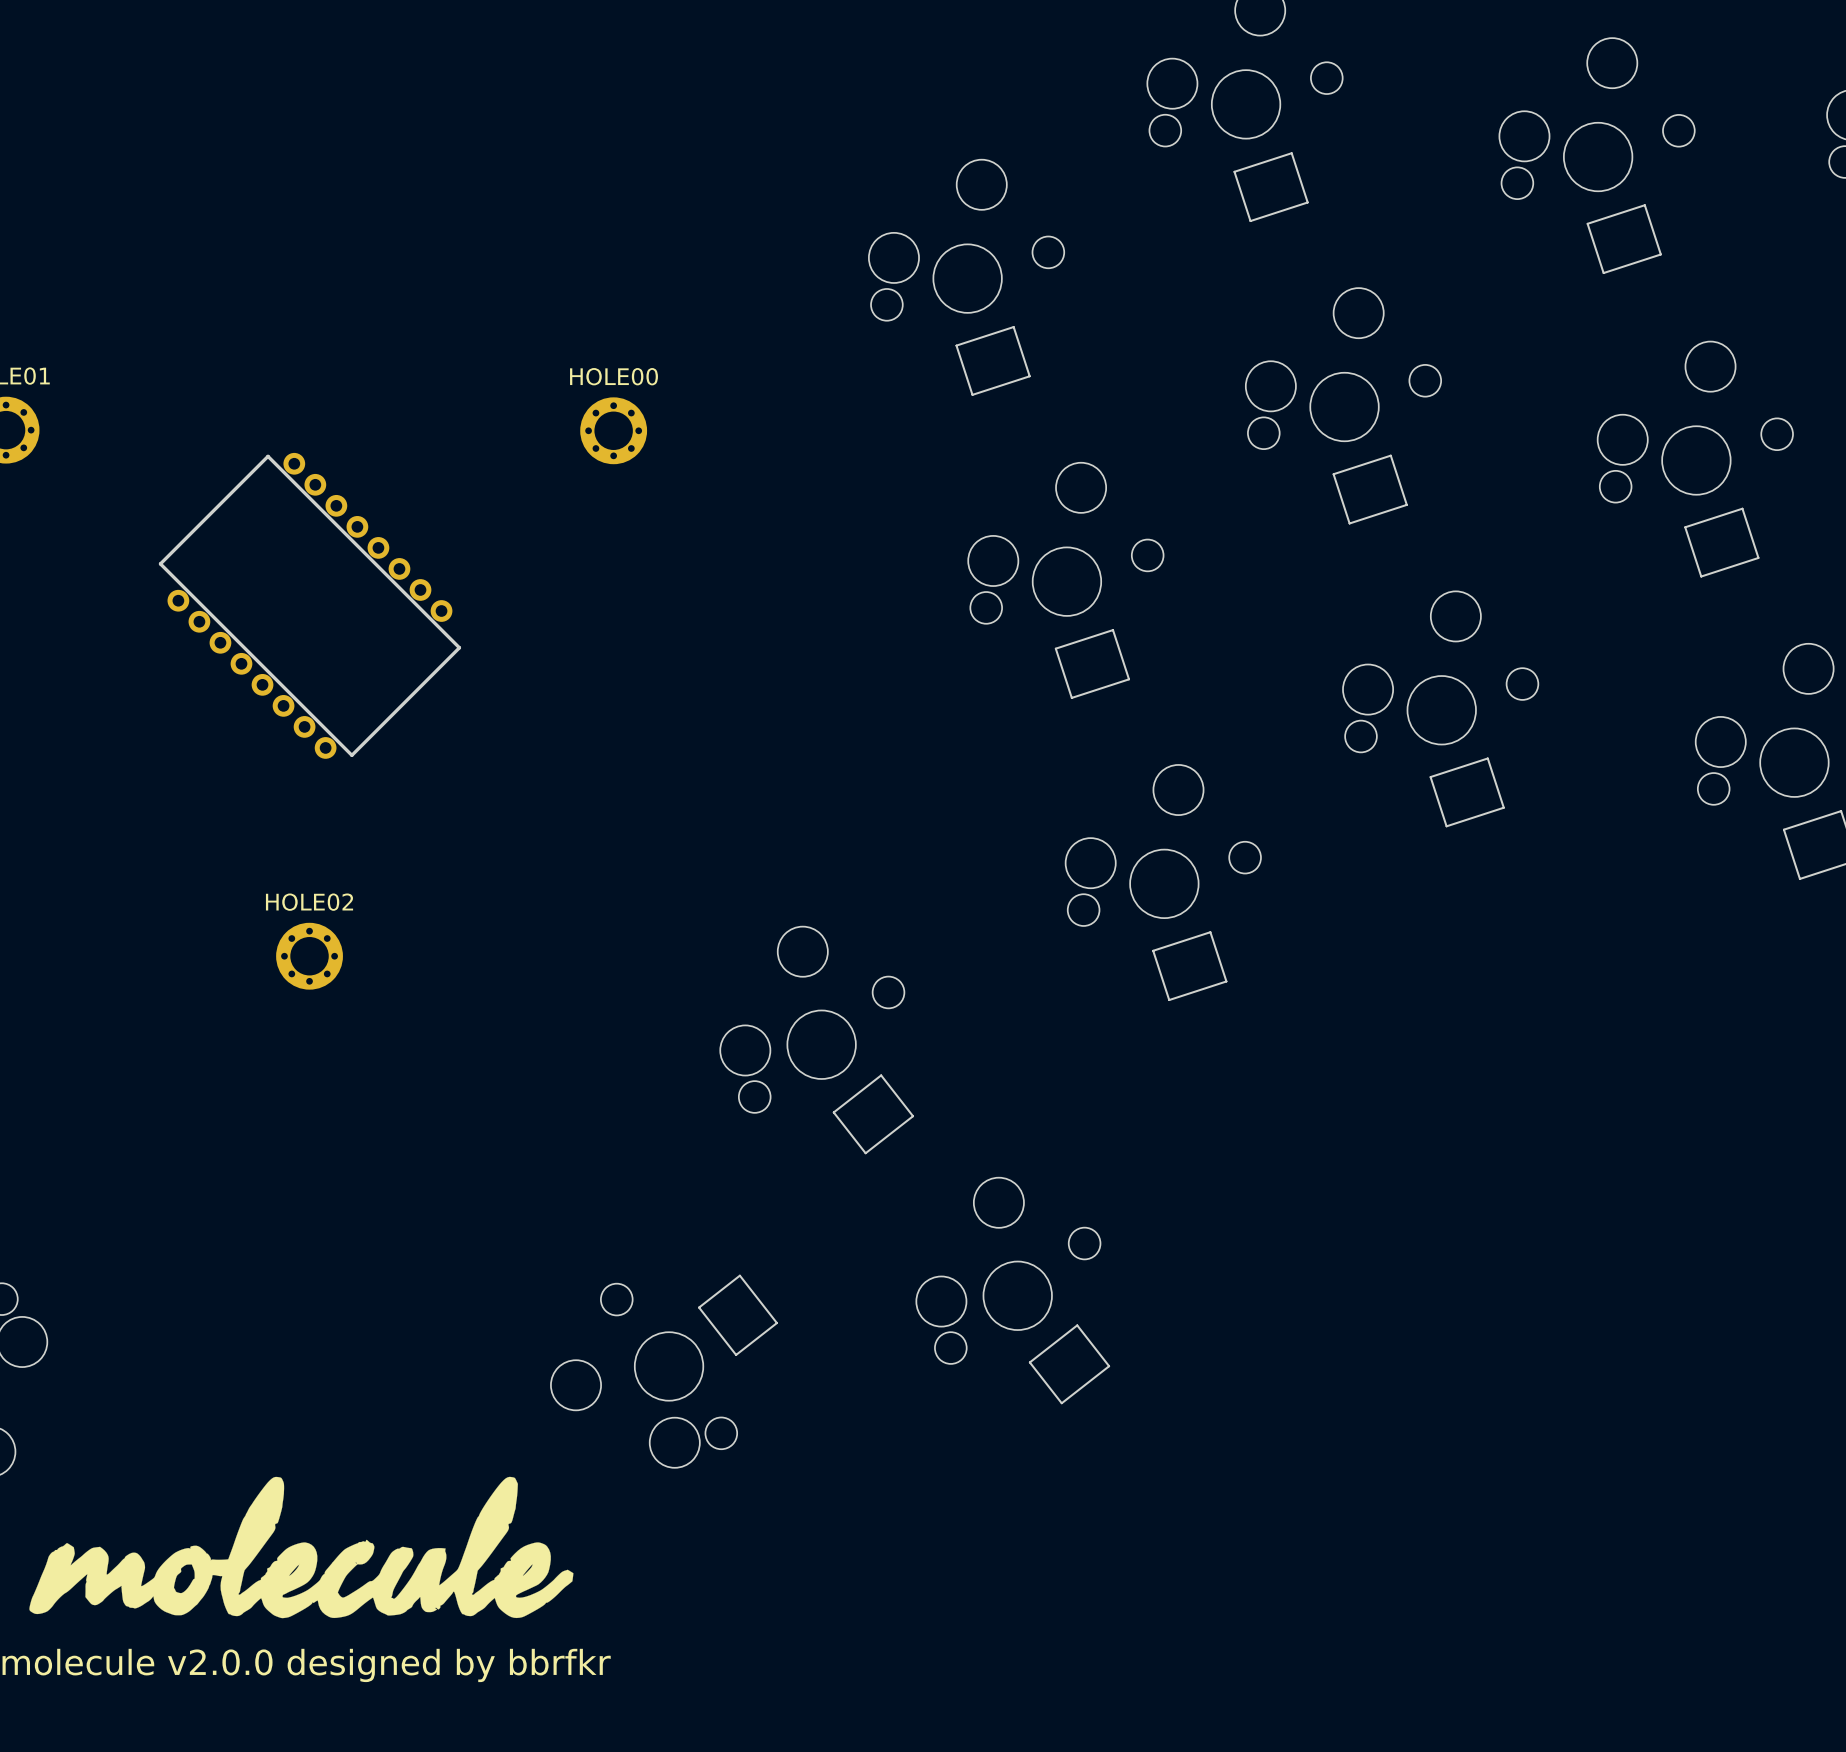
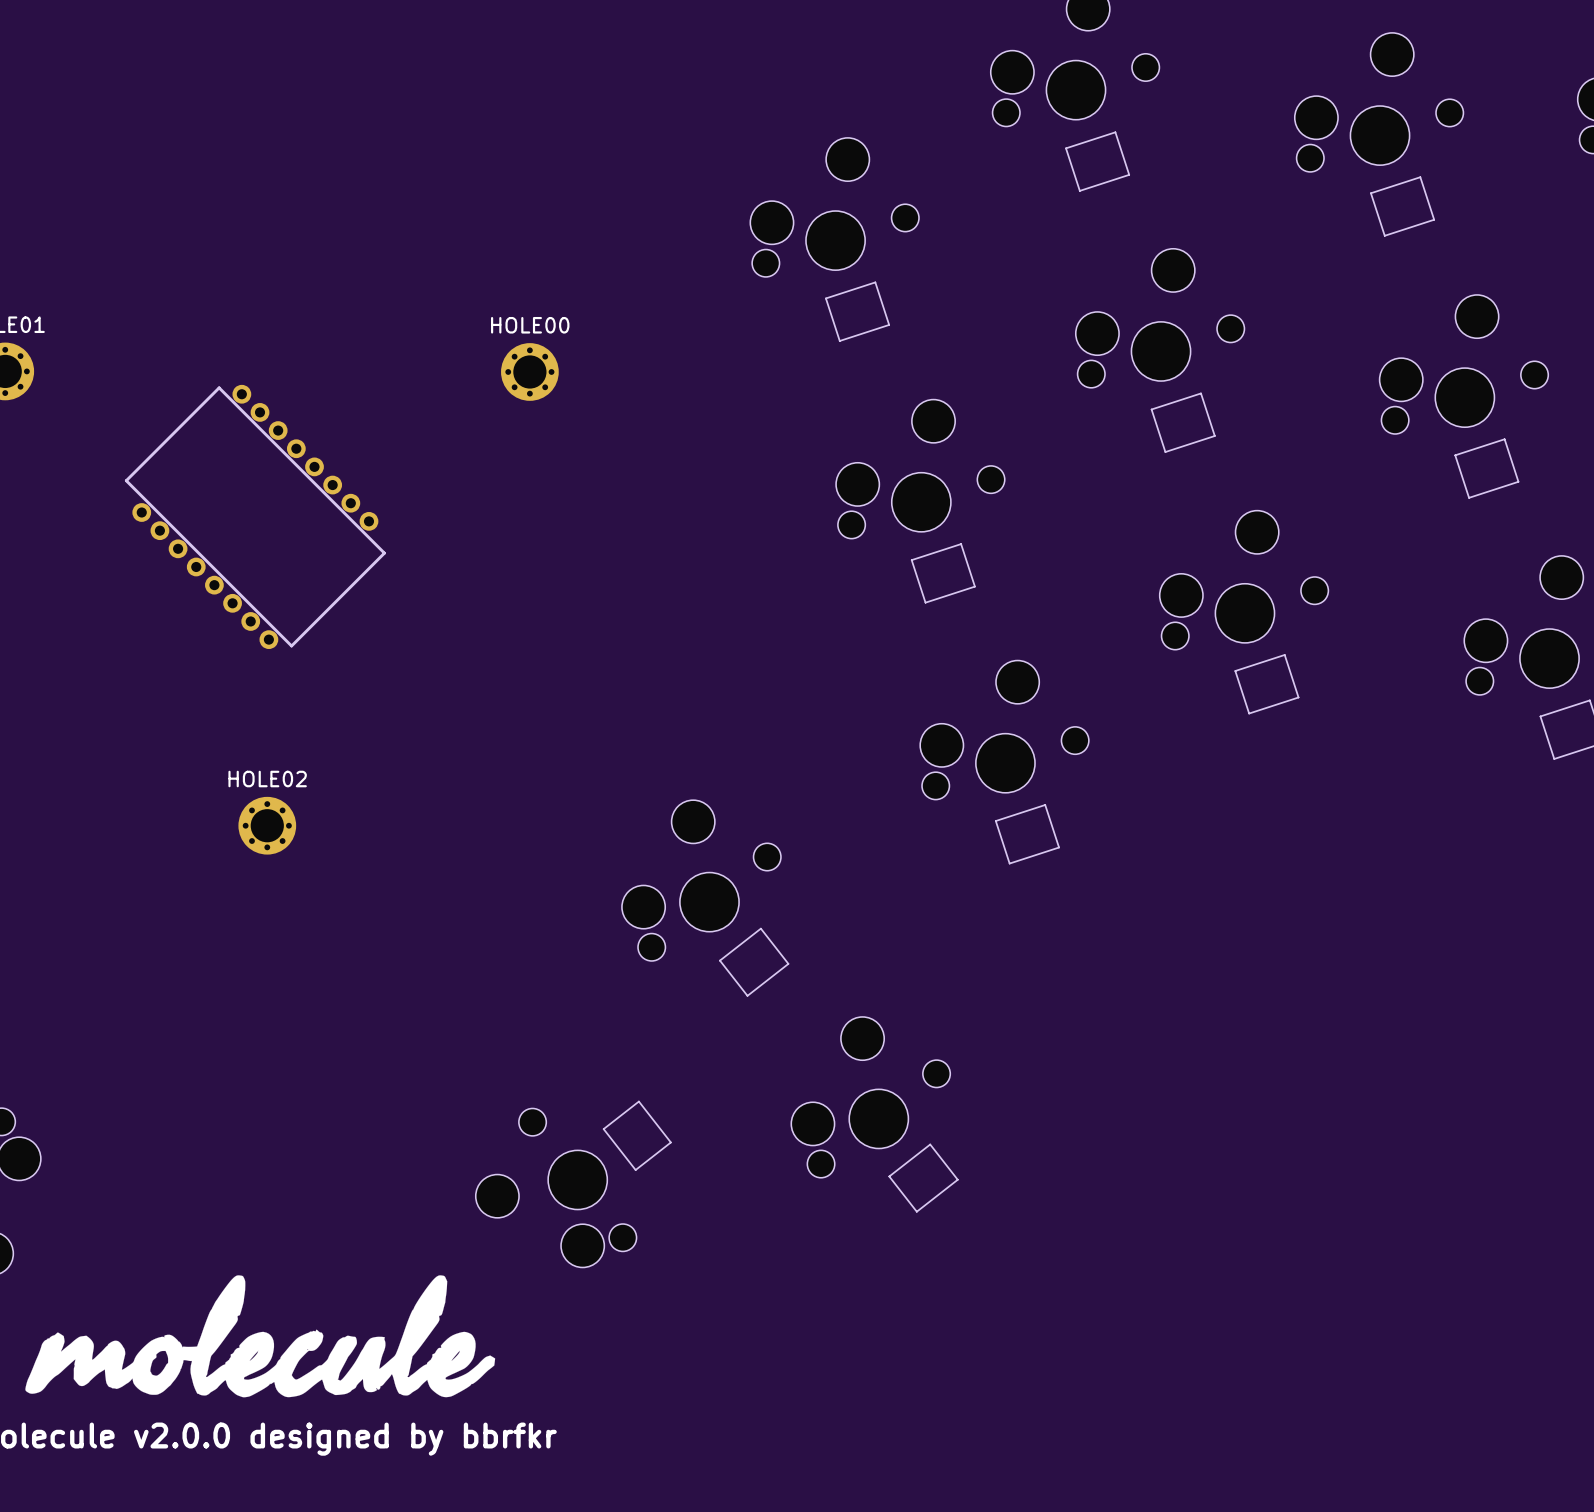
part position: (309, 605) -> (255, 516)

